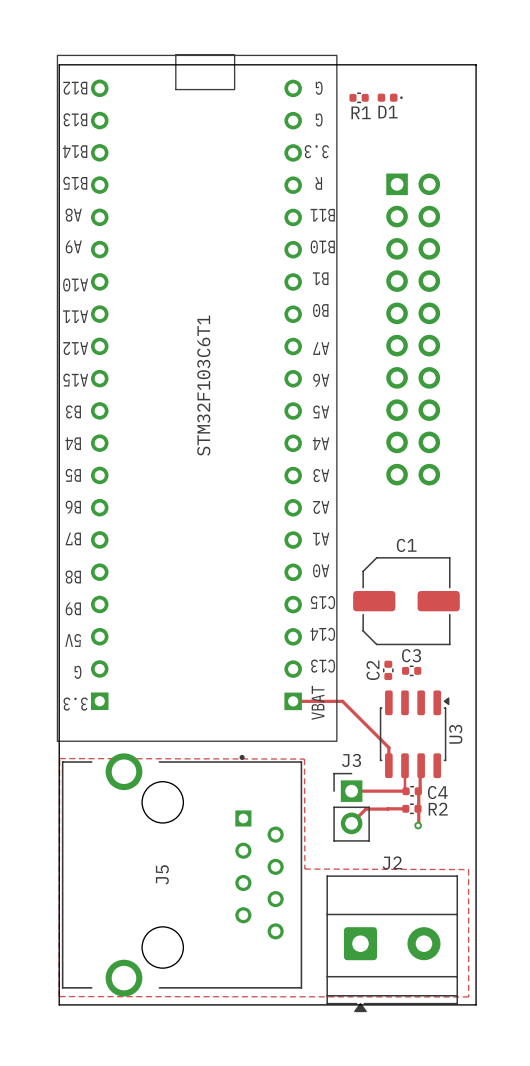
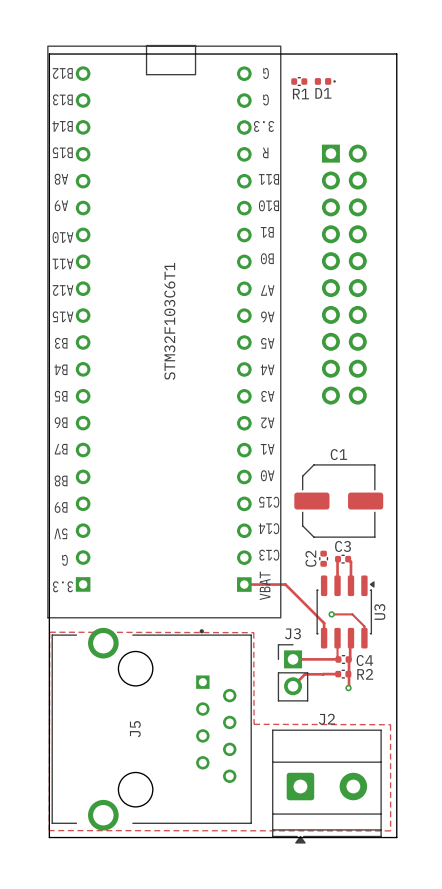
track: none -> (338, 559) (337, 585)
track: none -> (348, 559) (350, 561) (350, 585)
track: none -> (331, 614) (352, 614) (364, 626) (364, 638)
via: none -> (331, 614)

